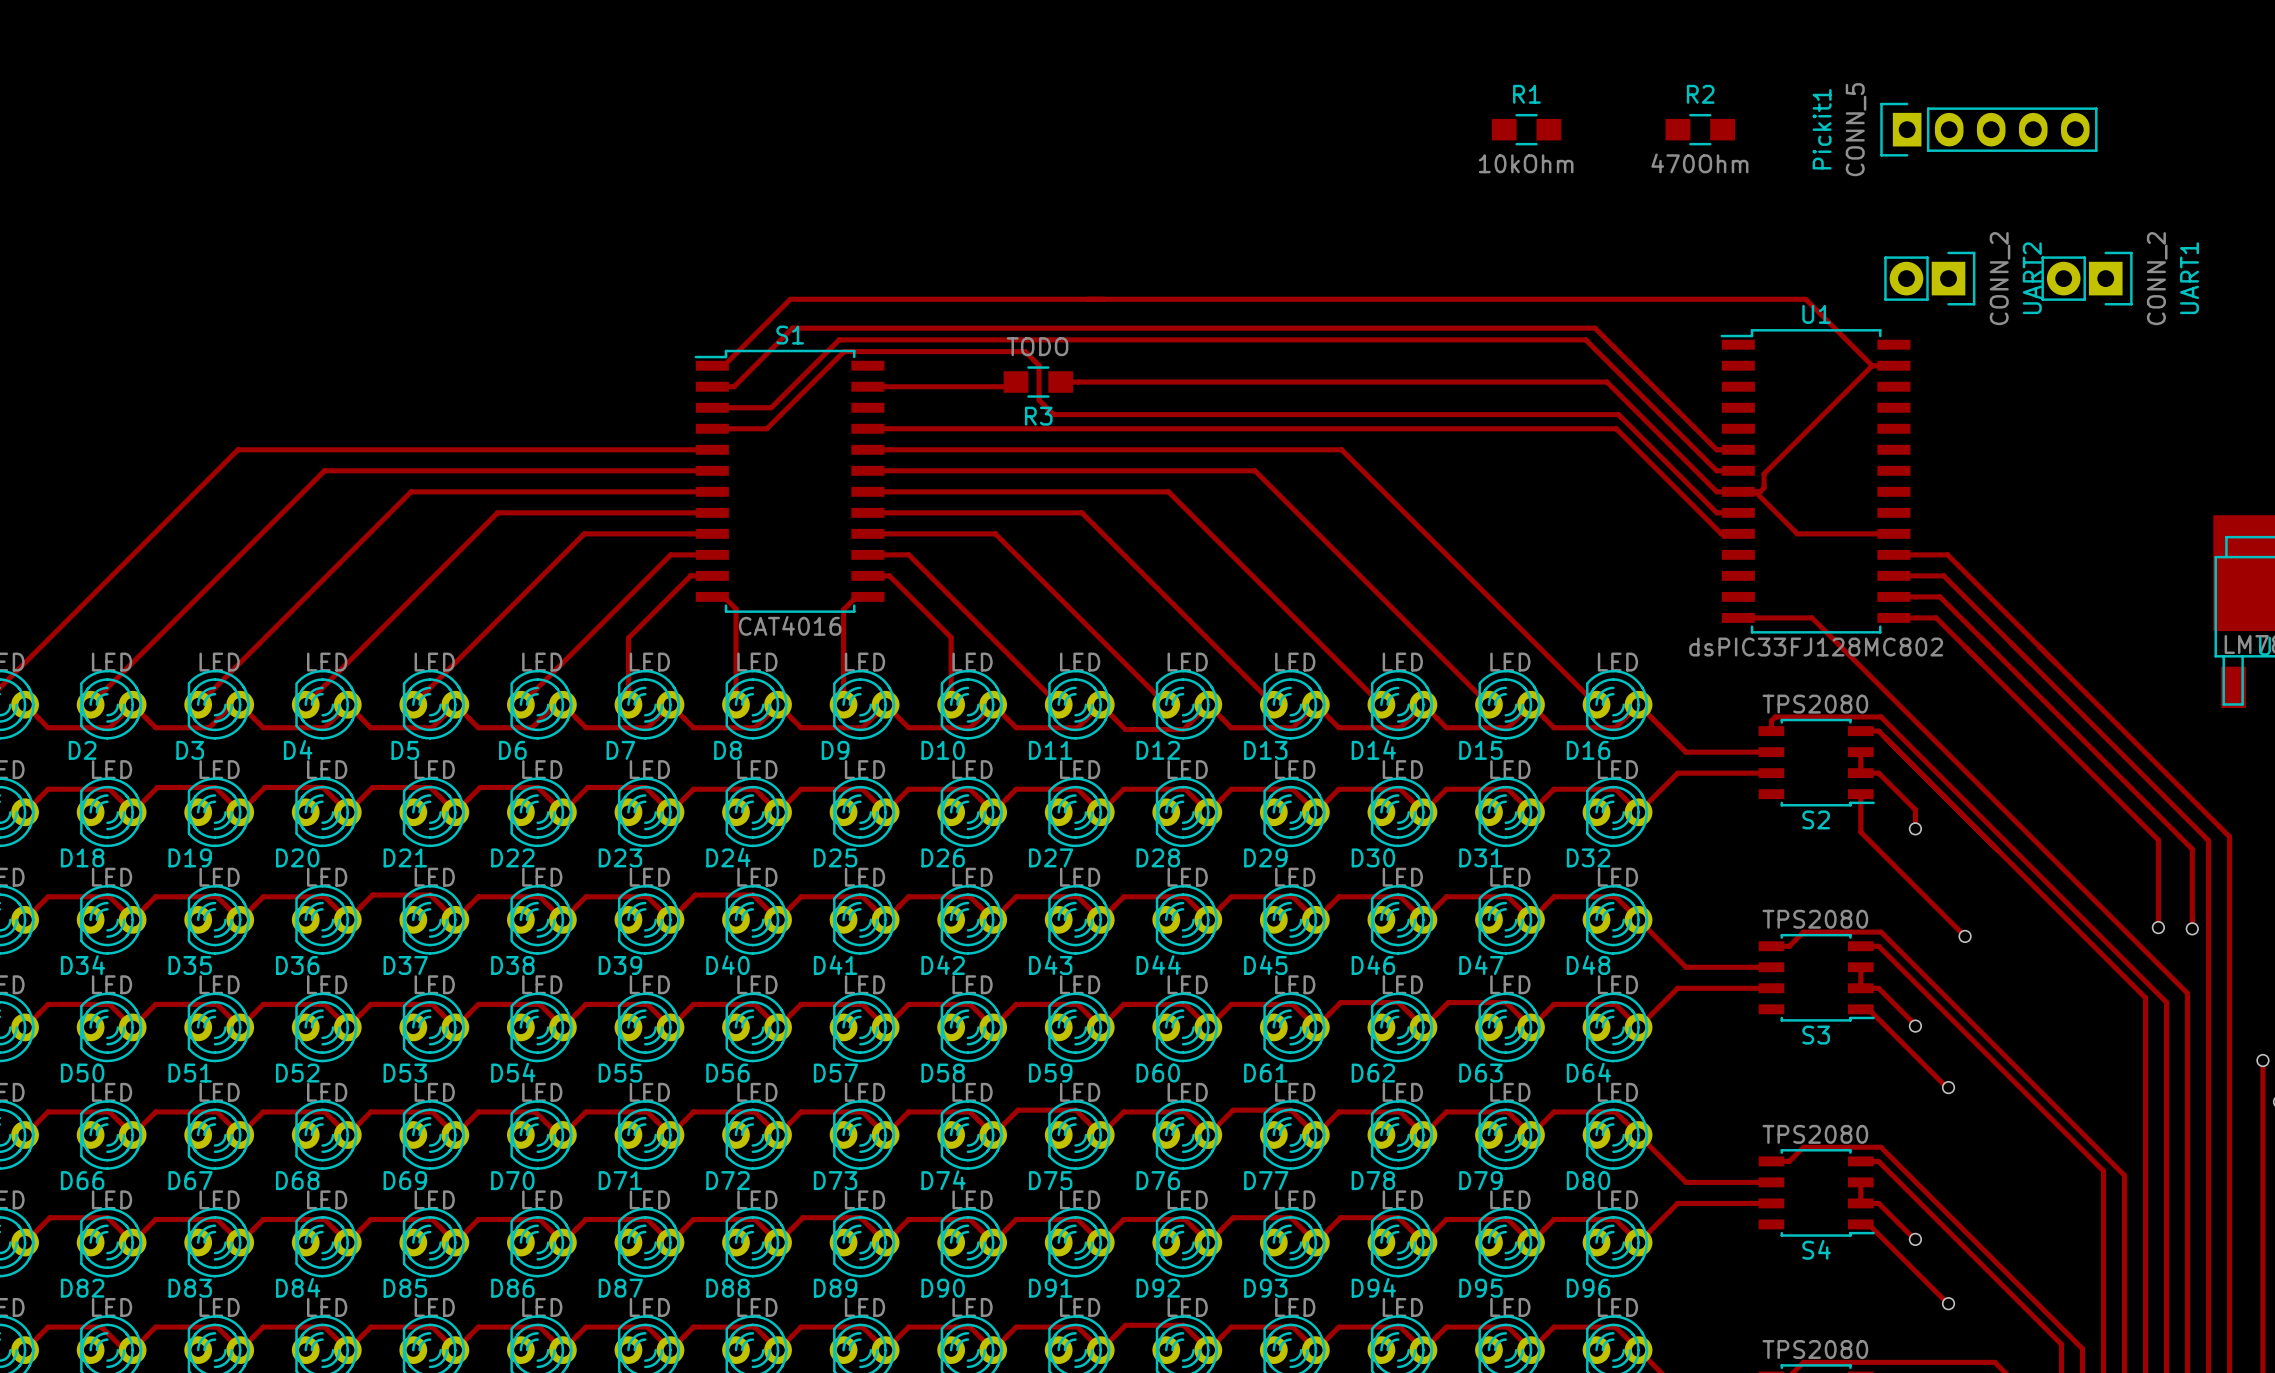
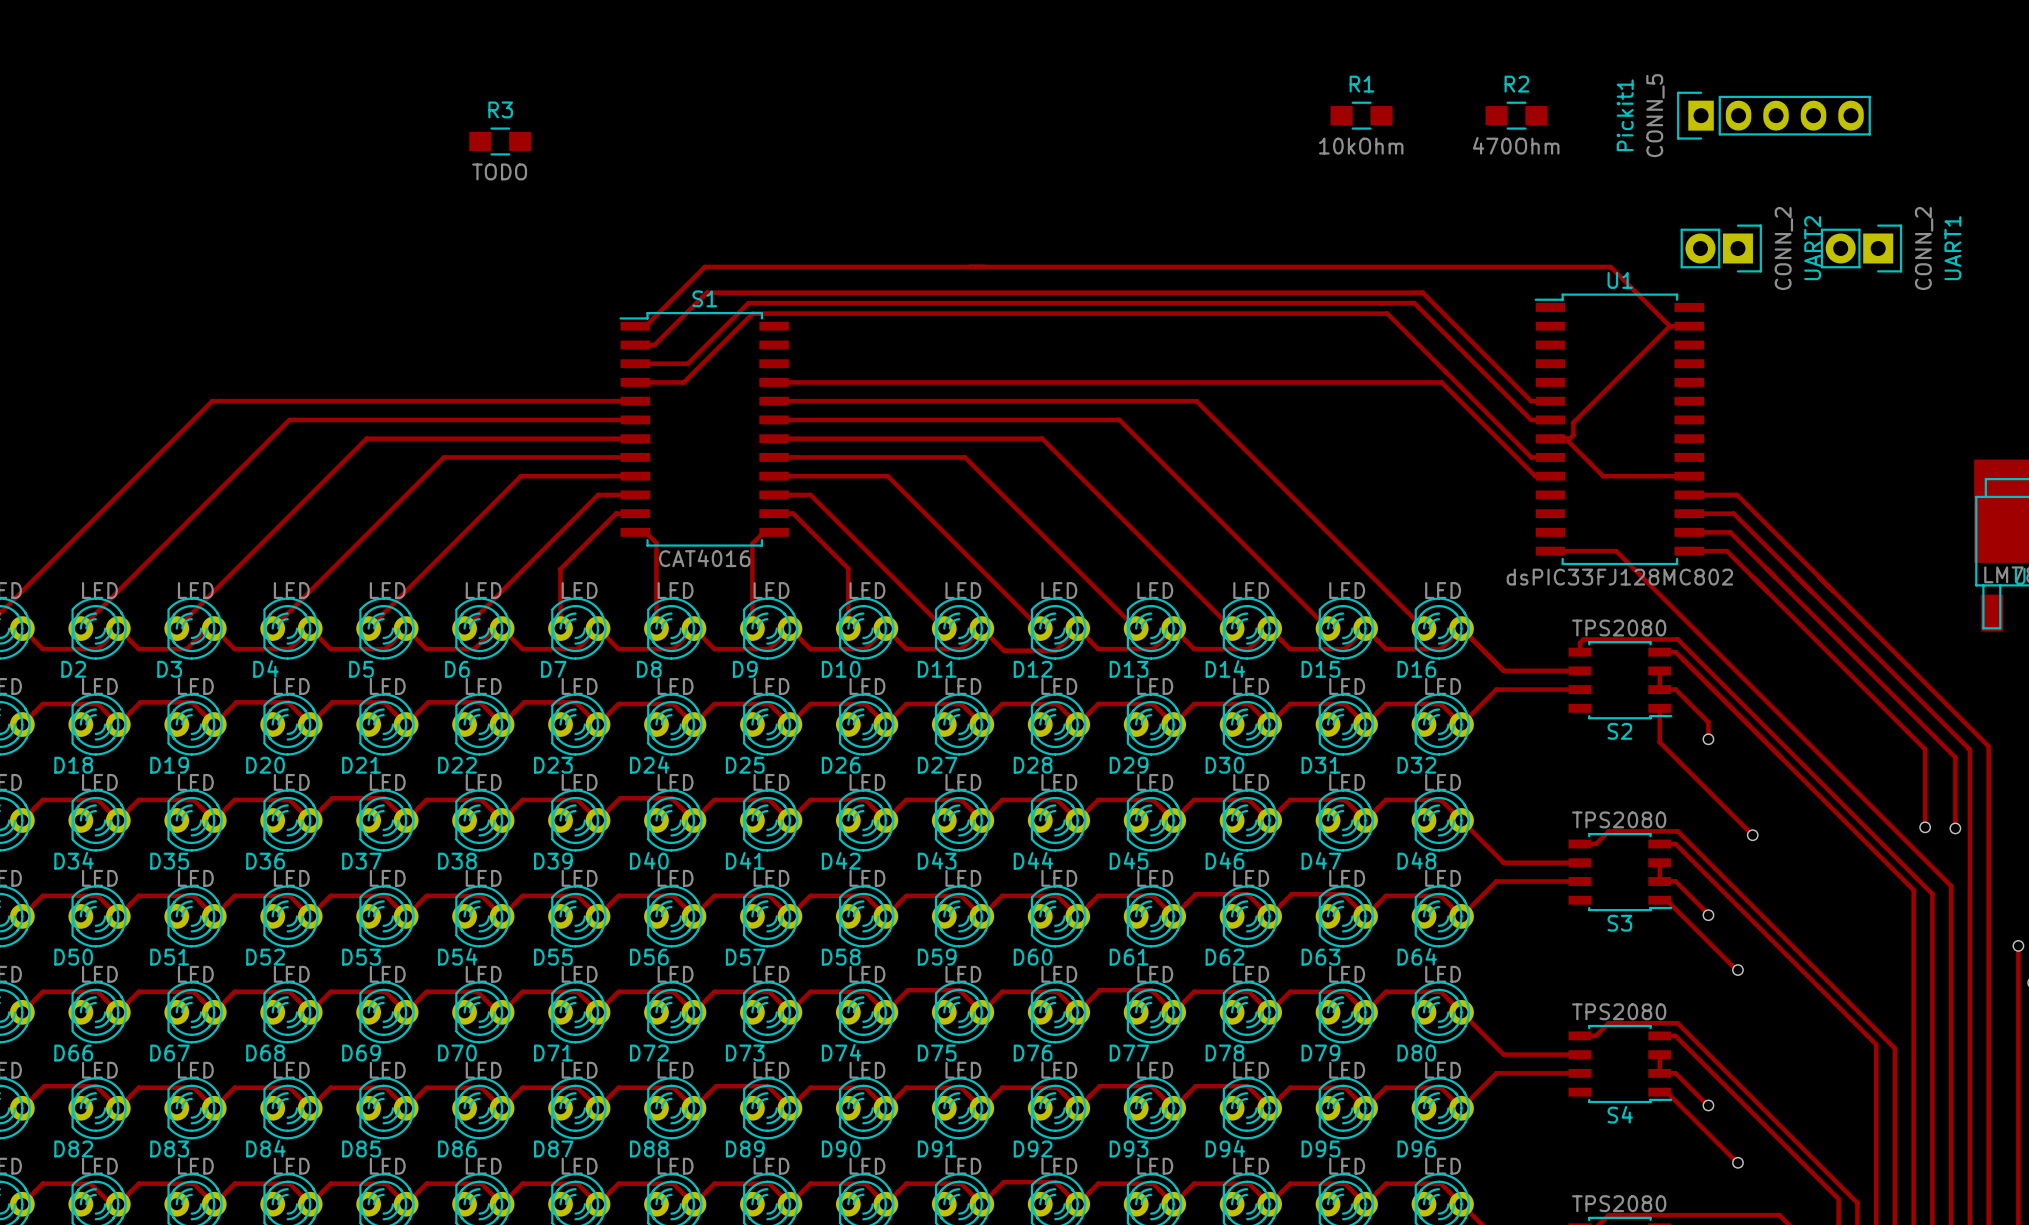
R3 value position: TODO (1037, 346) -> TODO (499, 171)
track: (1025, 351) (1039, 365) (1039, 400) (1053, 414) (1618, 414) -> (914, 313) (1387, 313) (1443, 369)
track: (1016, 382) (1011, 386) (867, 386) -> none
R3 position: (1038, 382) -> (500, 141)
track: (1060, 382) (1606, 382) (1716, 491) (1738, 491) -> none
R3 name position: R3 (1038, 416) -> R3 (500, 109)

